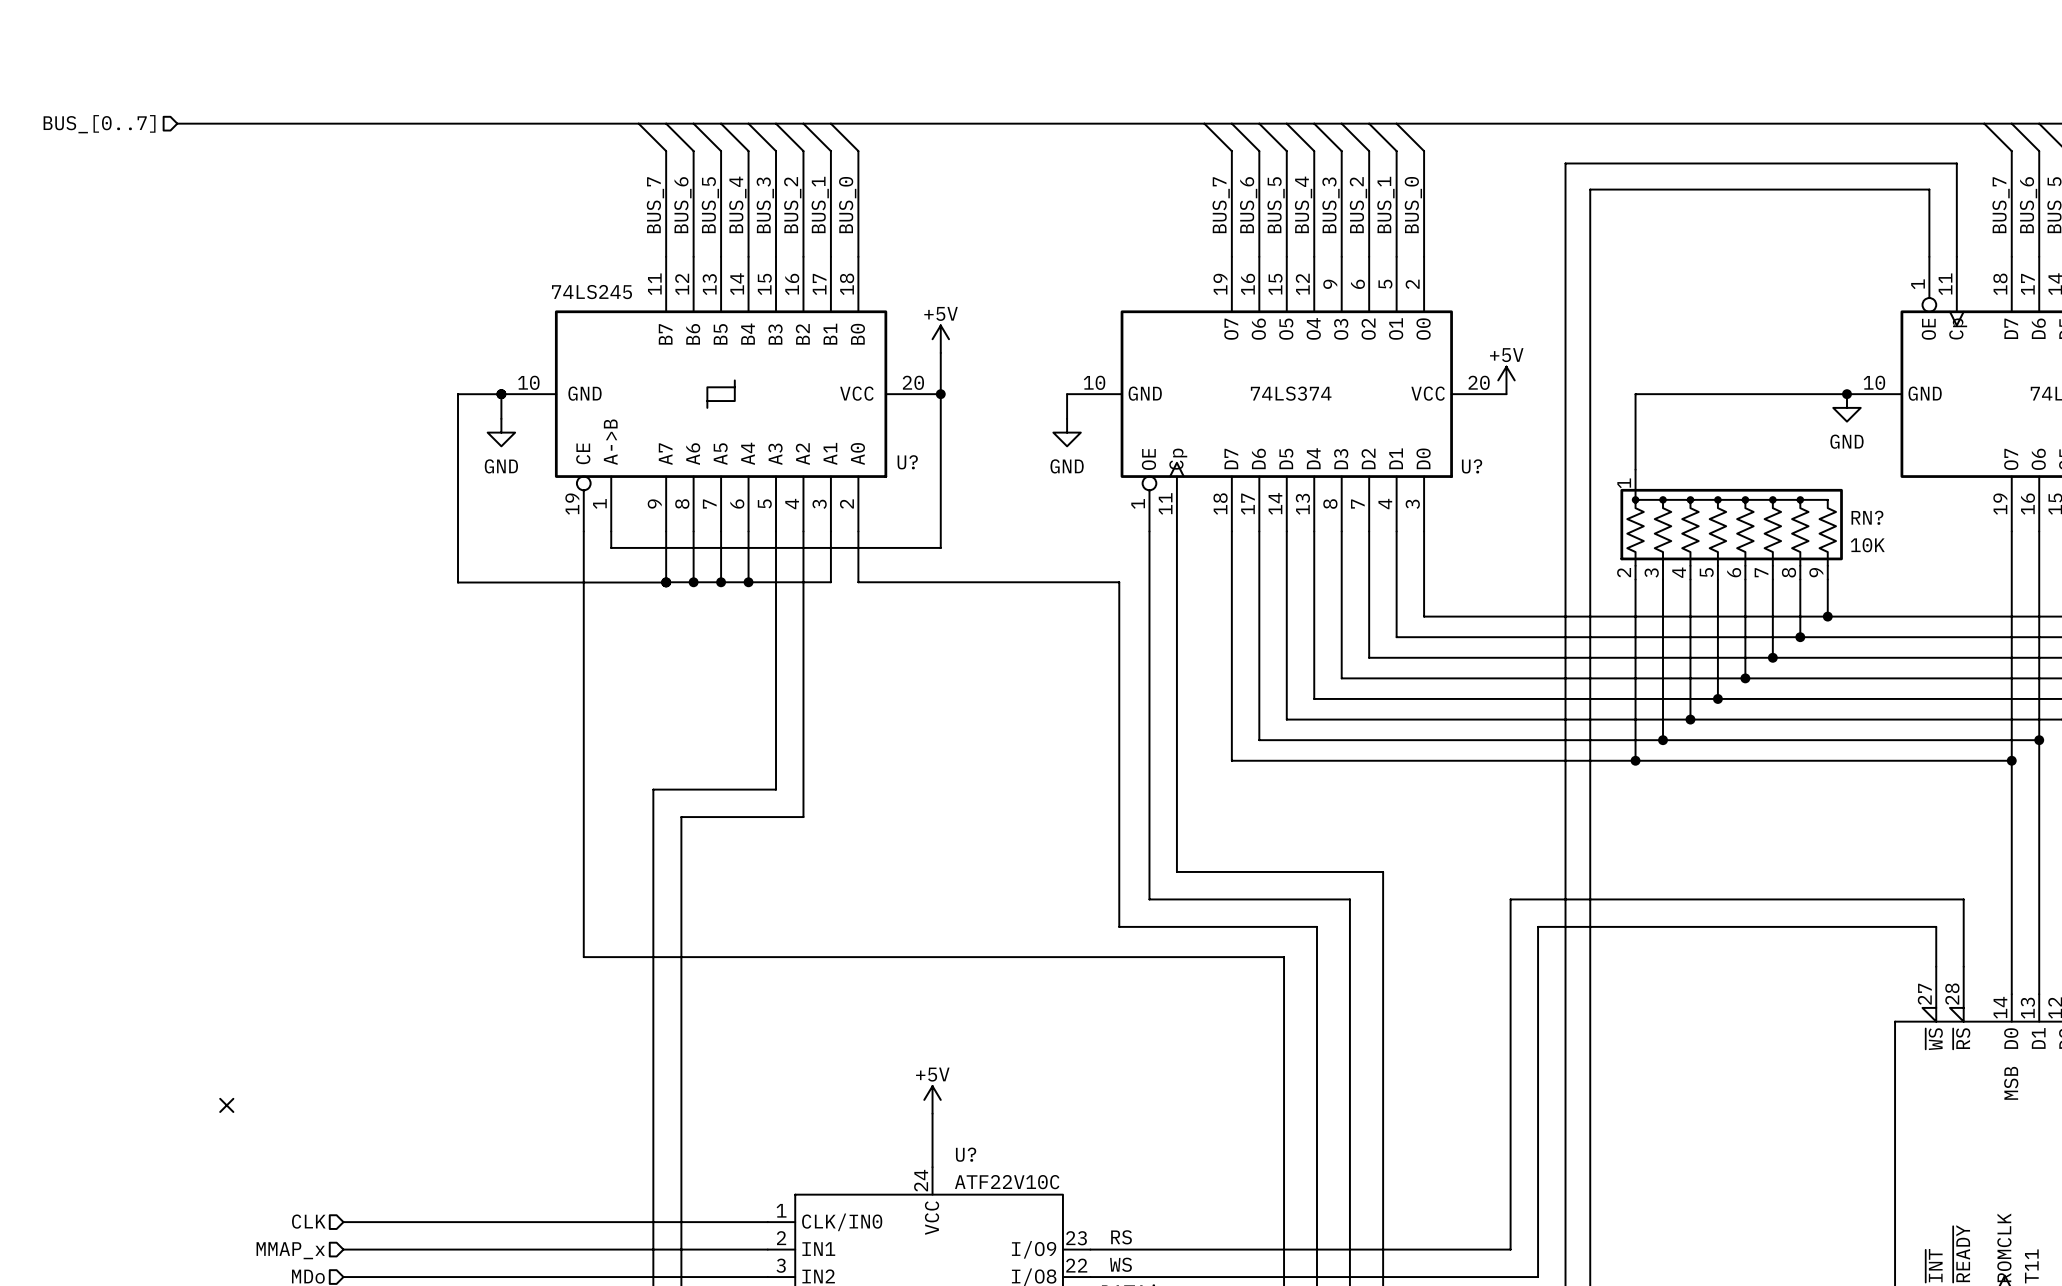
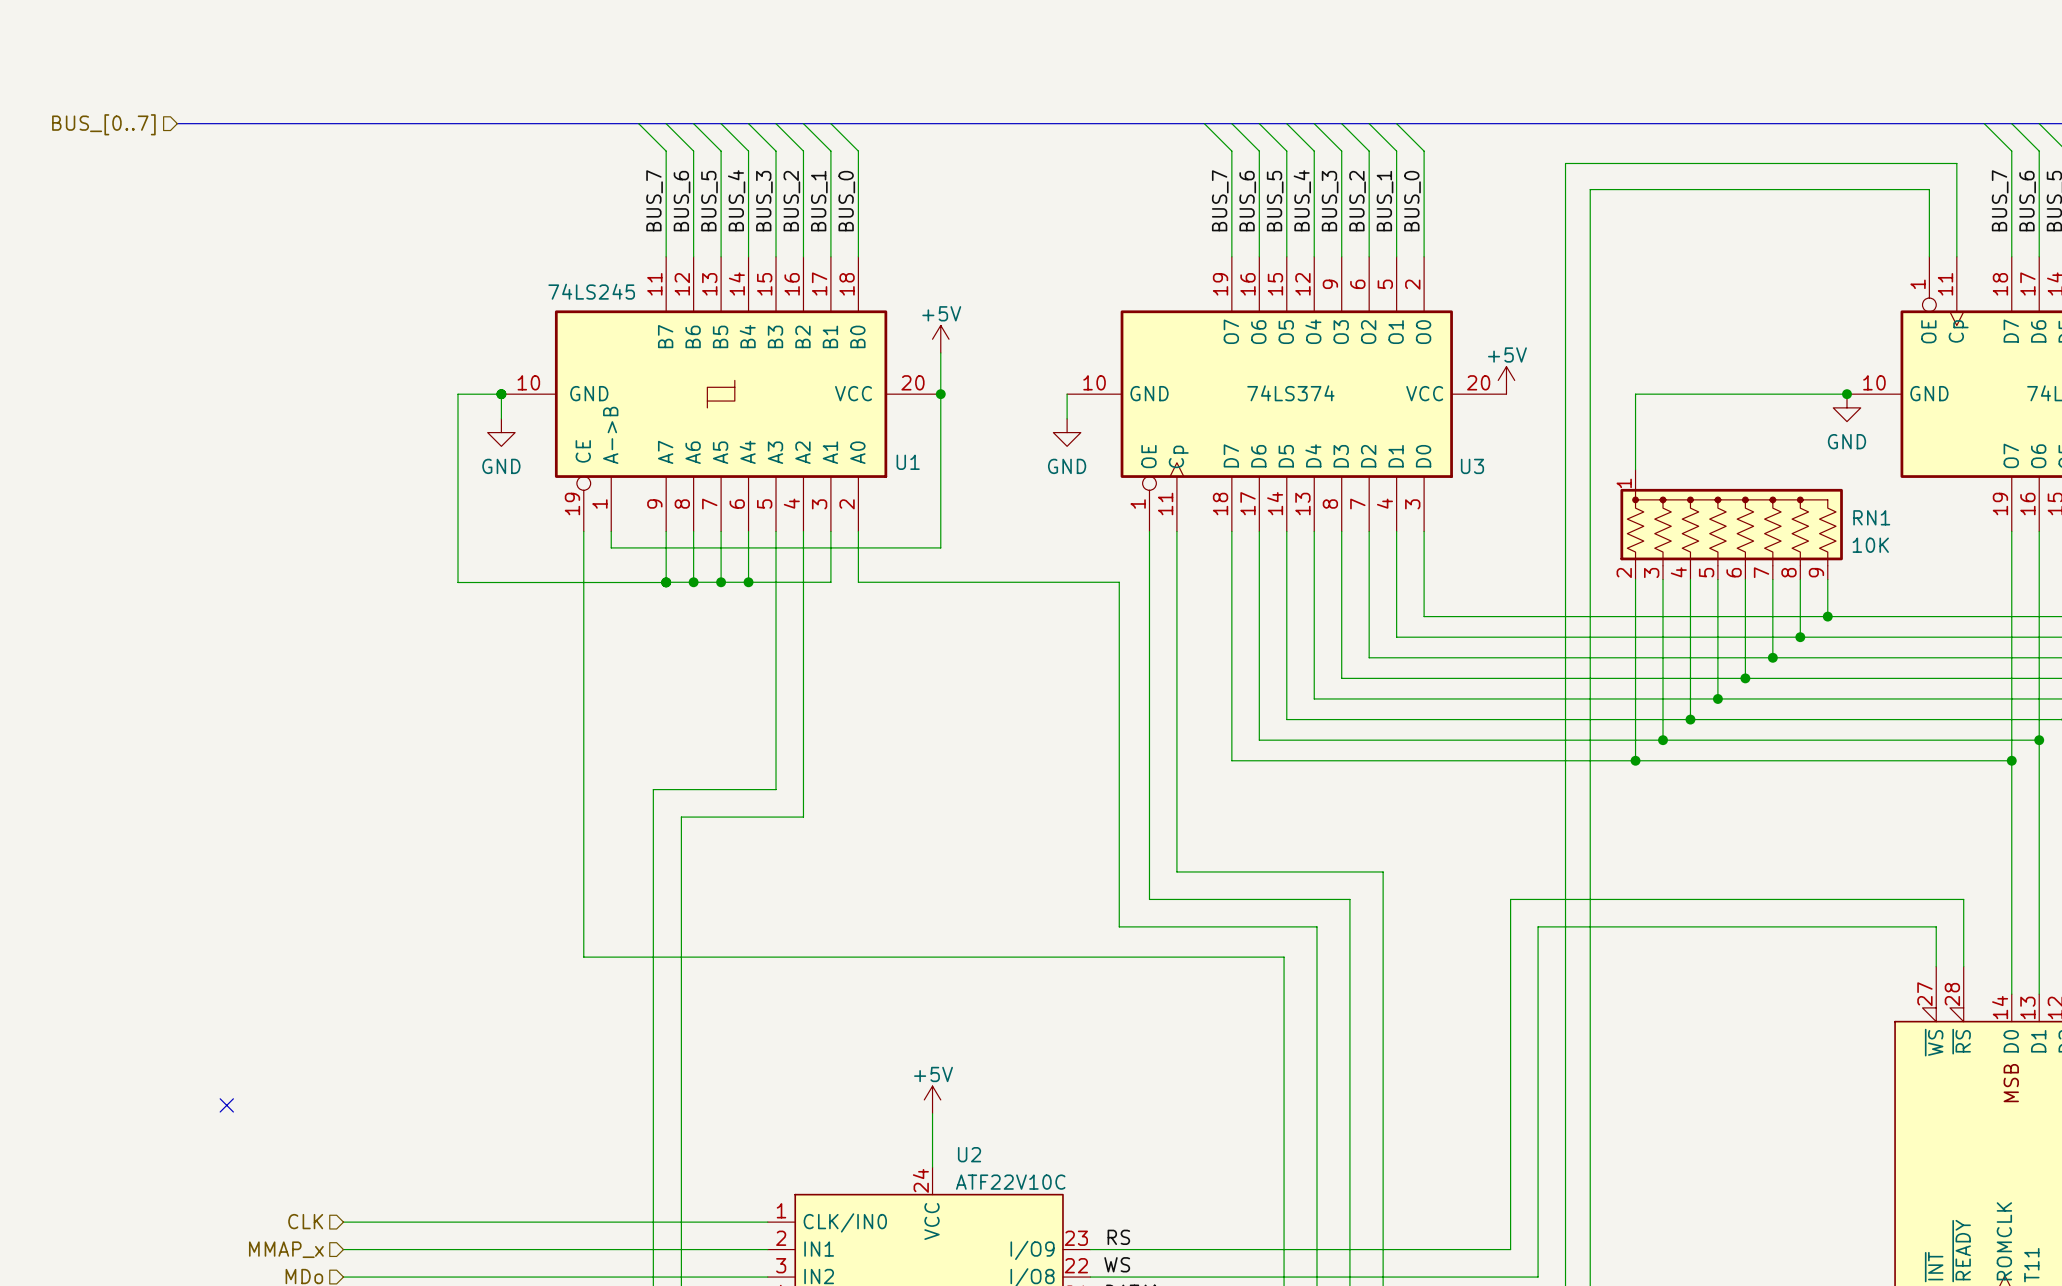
U? name: U? (907, 462) -> U1 (908, 462)
U? name: U? (1472, 466) -> U3 (1472, 466)
RN? name: RN? (1867, 517) -> RN1 (1871, 517)
U? name: U? (966, 1154) -> U2 (969, 1154)

